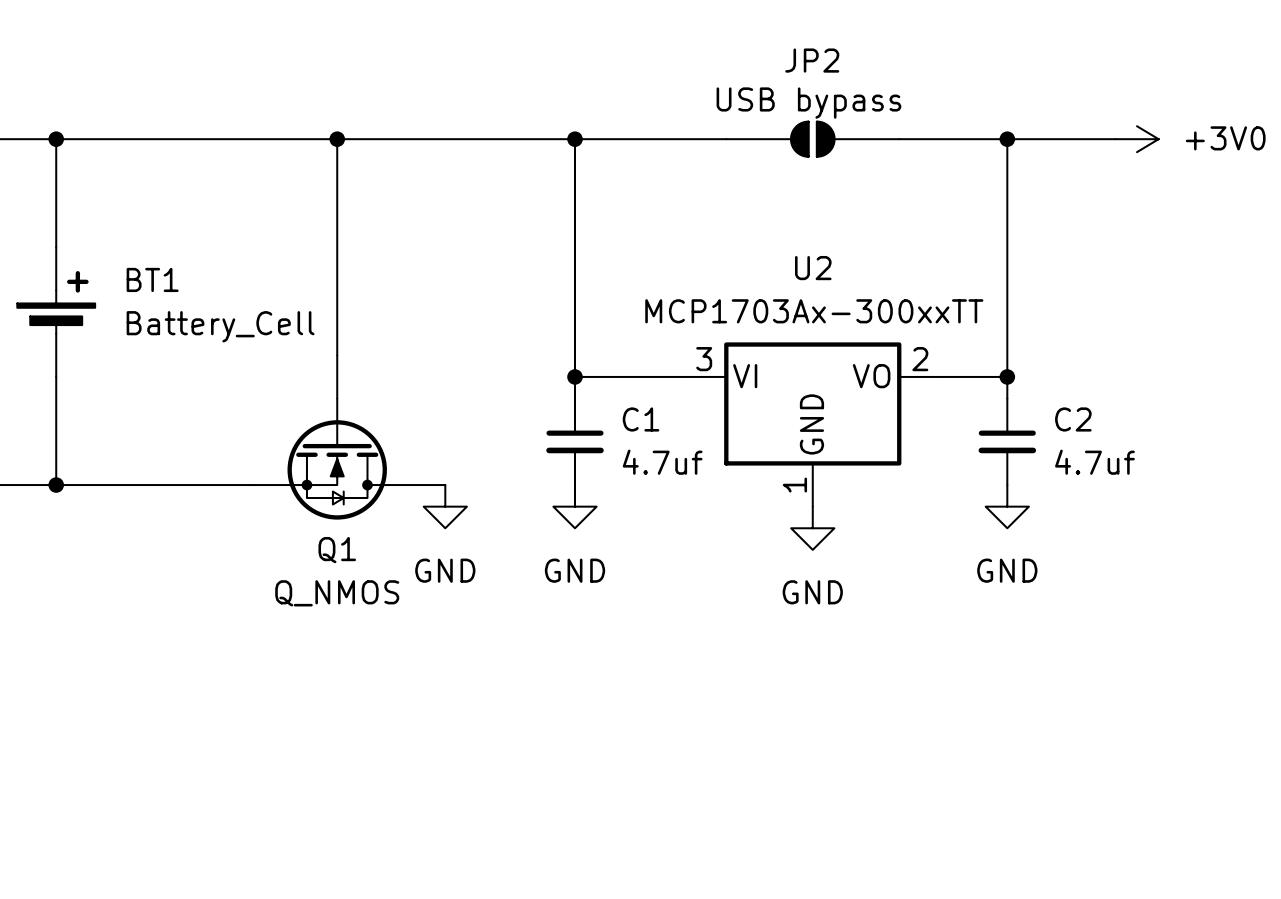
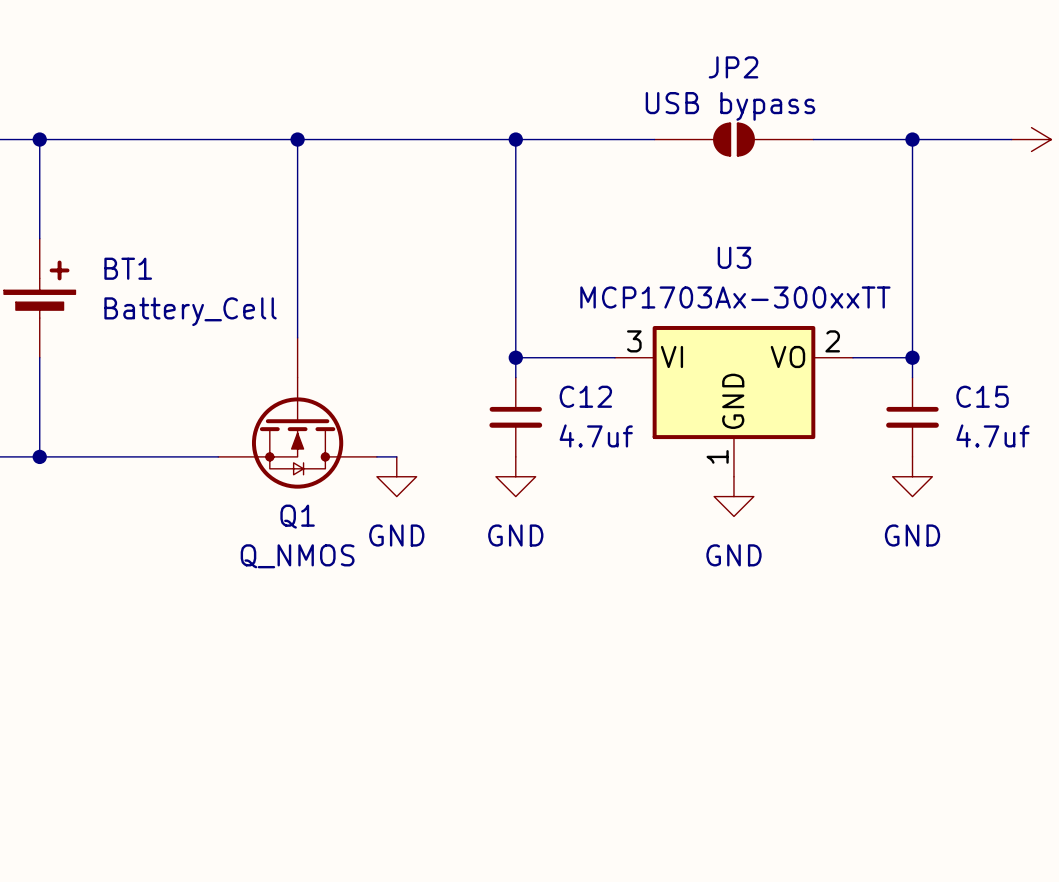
U2 name: U2 (813, 268) -> U3 (734, 257)
C1 name: C1 (641, 419) -> C12 (585, 396)
C2 name: C2 (1073, 419) -> C15 (982, 396)

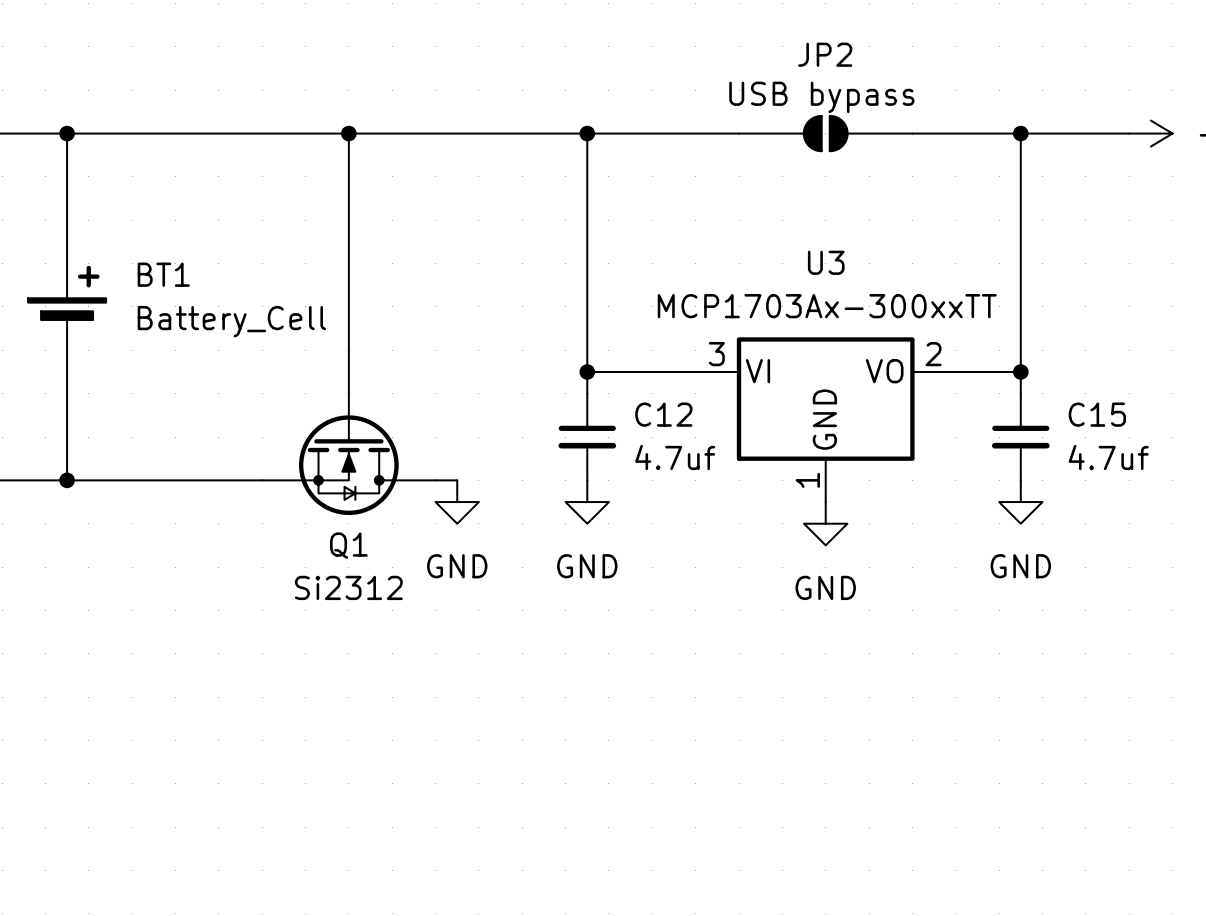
Q1 value: Q_NMOS (297, 556) -> Si2312 (348, 587)

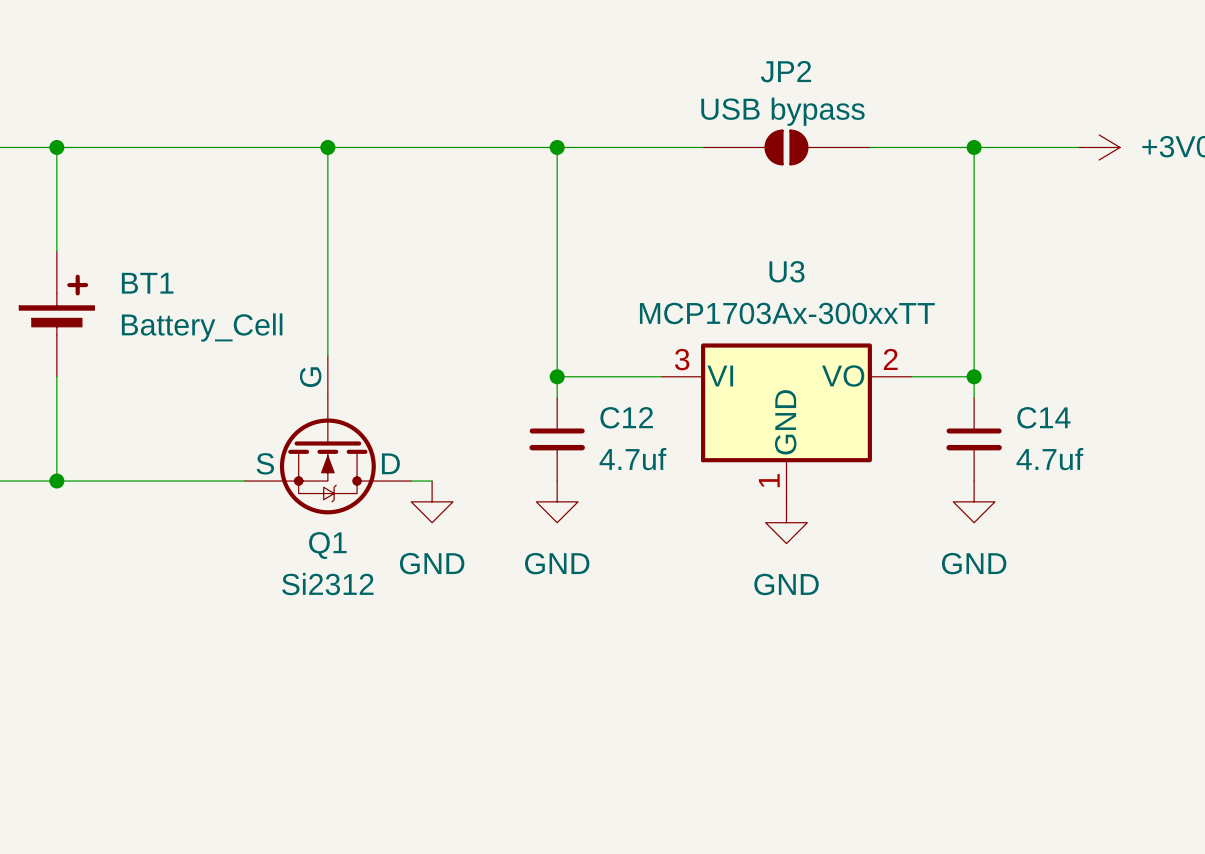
Q1 symbol: [262, 350, 436, 516] -> [244, 355, 412, 515]
C15 name: C15 (1097, 414) -> C14 (1043, 417)

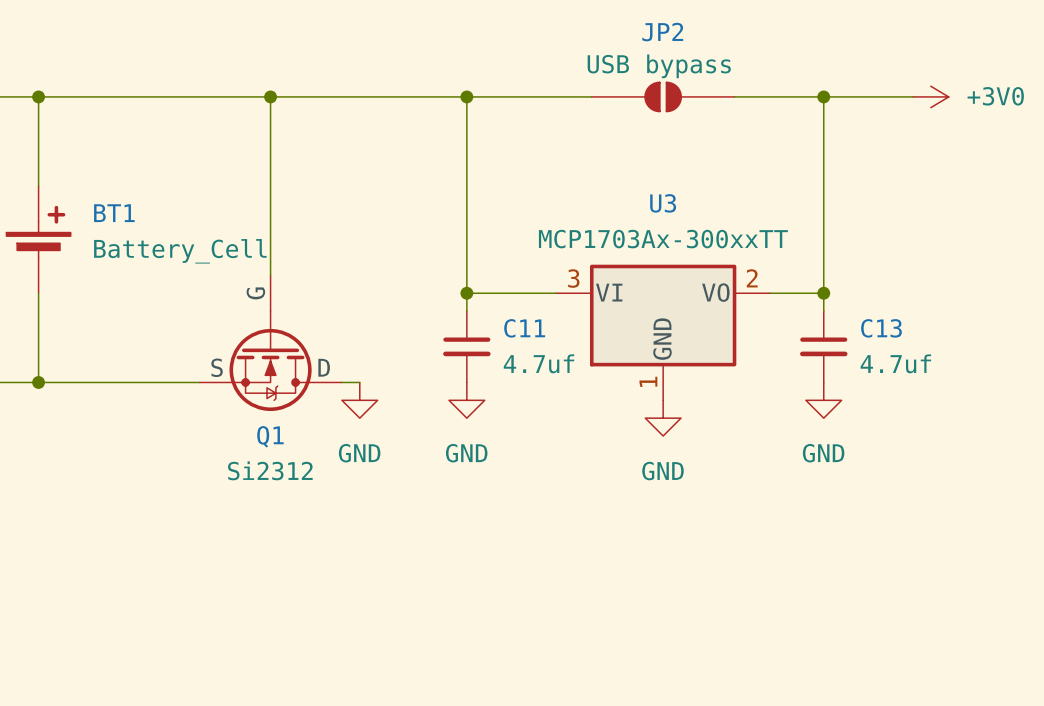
C12 name: C12 (626, 417) -> C11 (524, 328)
C14 name: C14 (1043, 417) -> C13 (881, 328)

